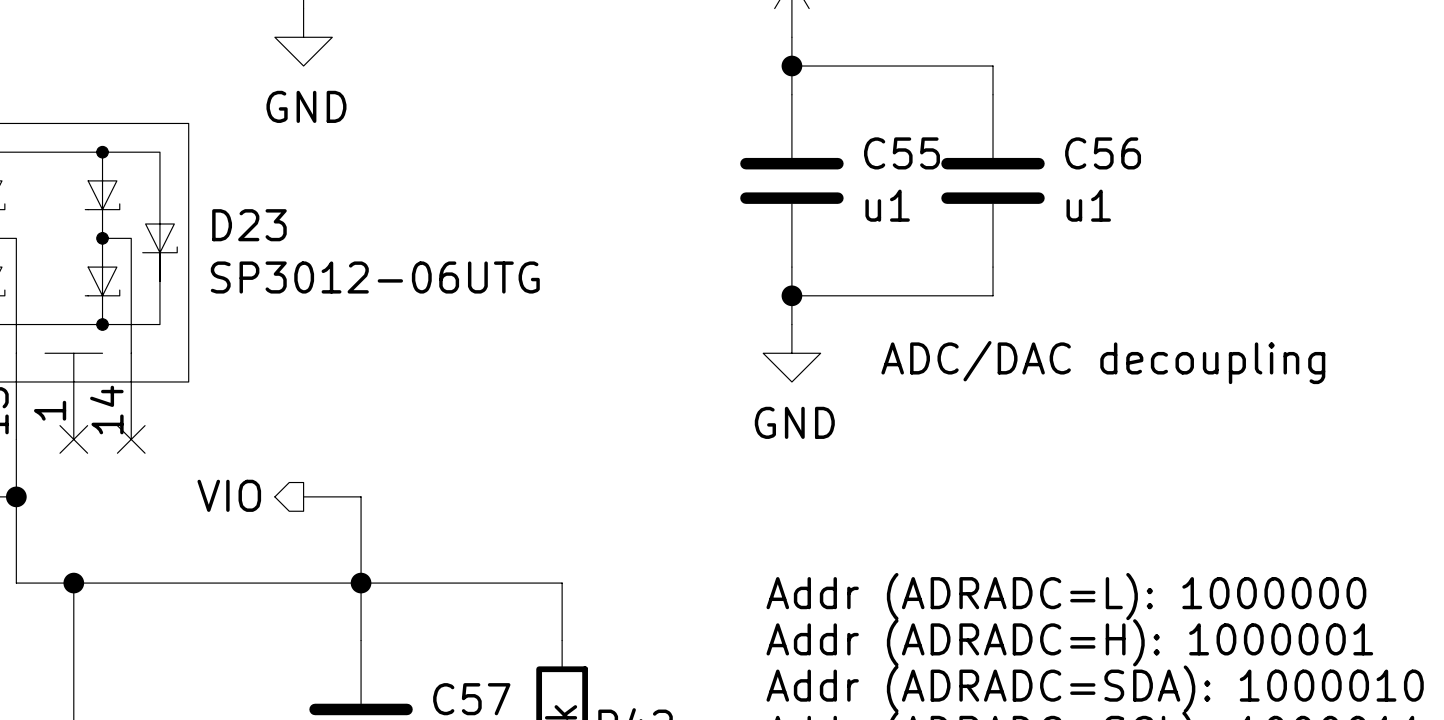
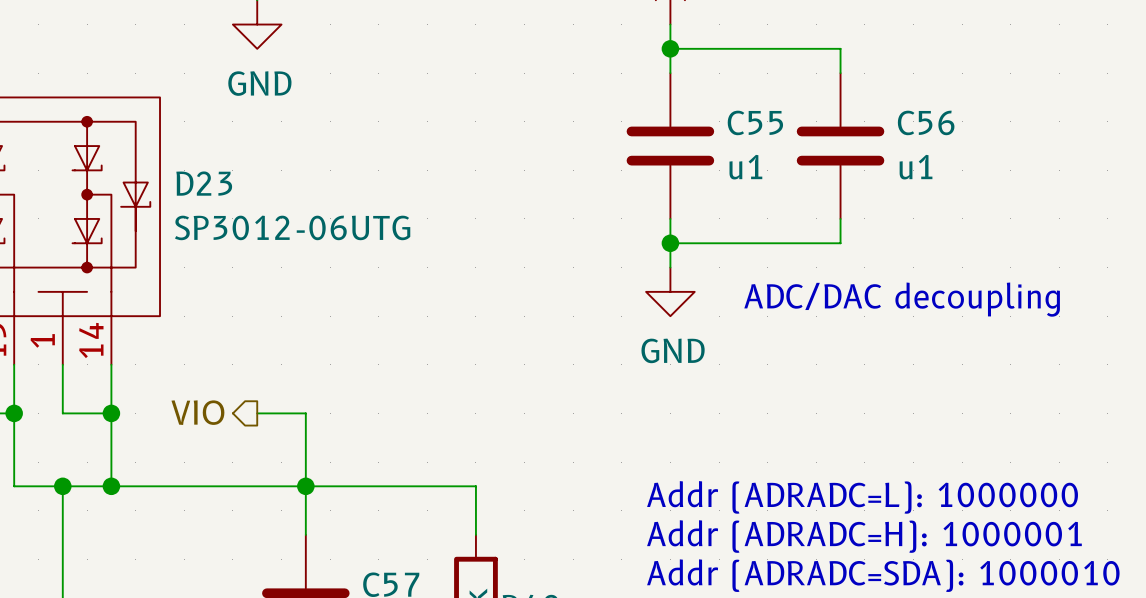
wire: none -> (62, 364) (62, 413) (111, 413)
no-connect mark: (73, 439) -> none
wire: none -> (111, 364) (111, 486)
no-connect mark: (131, 439) -> none
junction: none -> (111, 413)
junction: none -> (111, 486)

